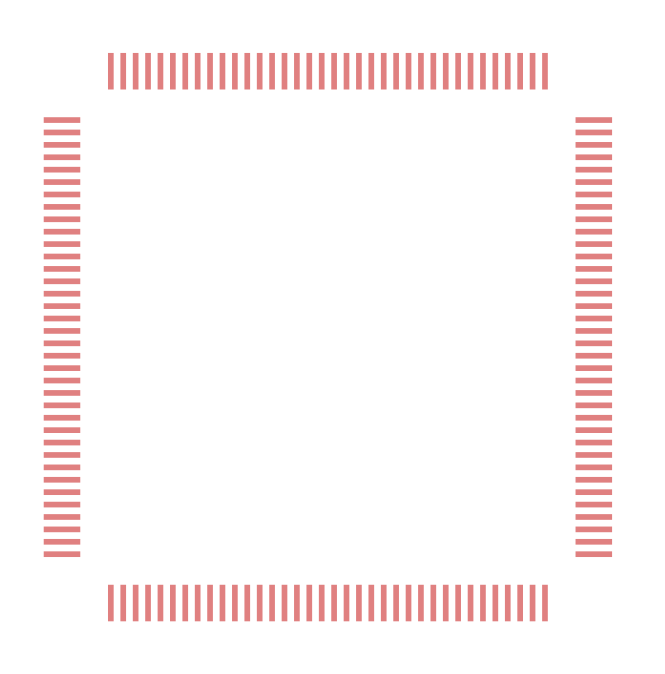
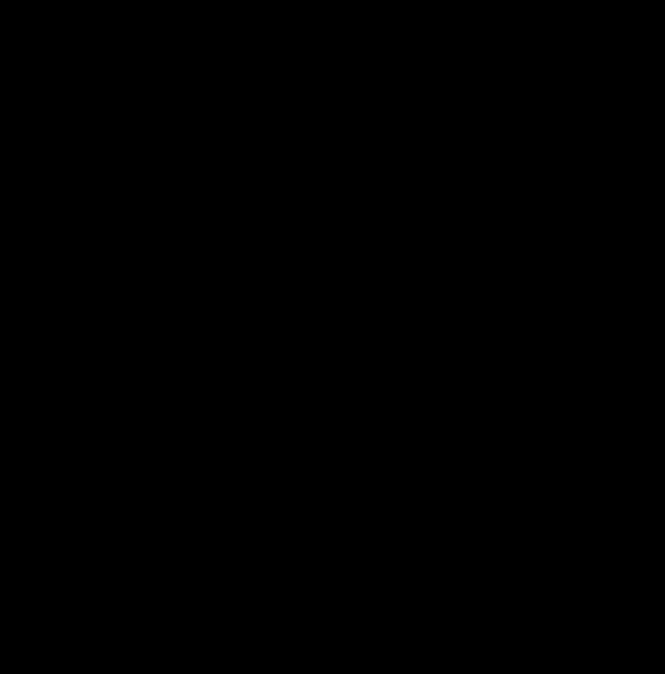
part: (327, 337) -> none

